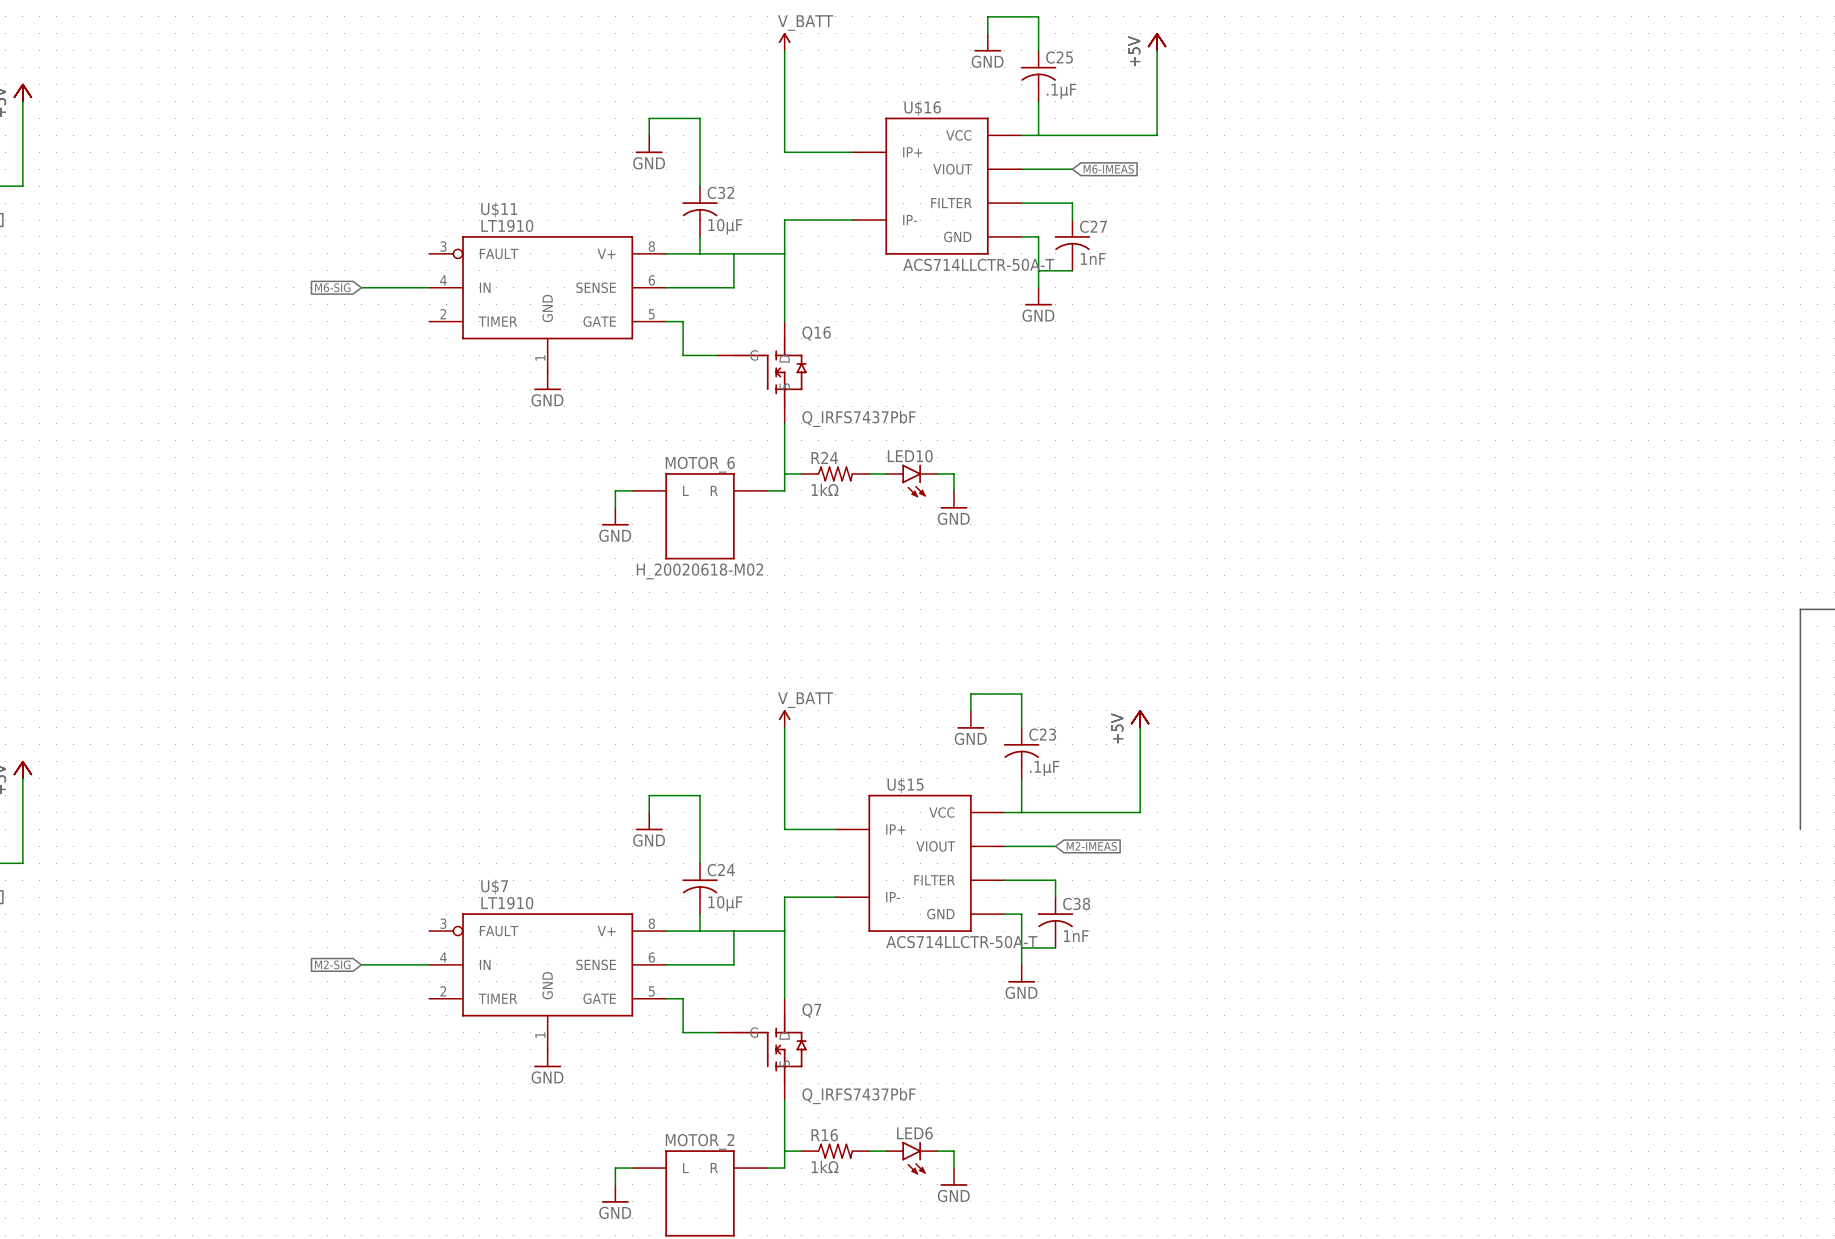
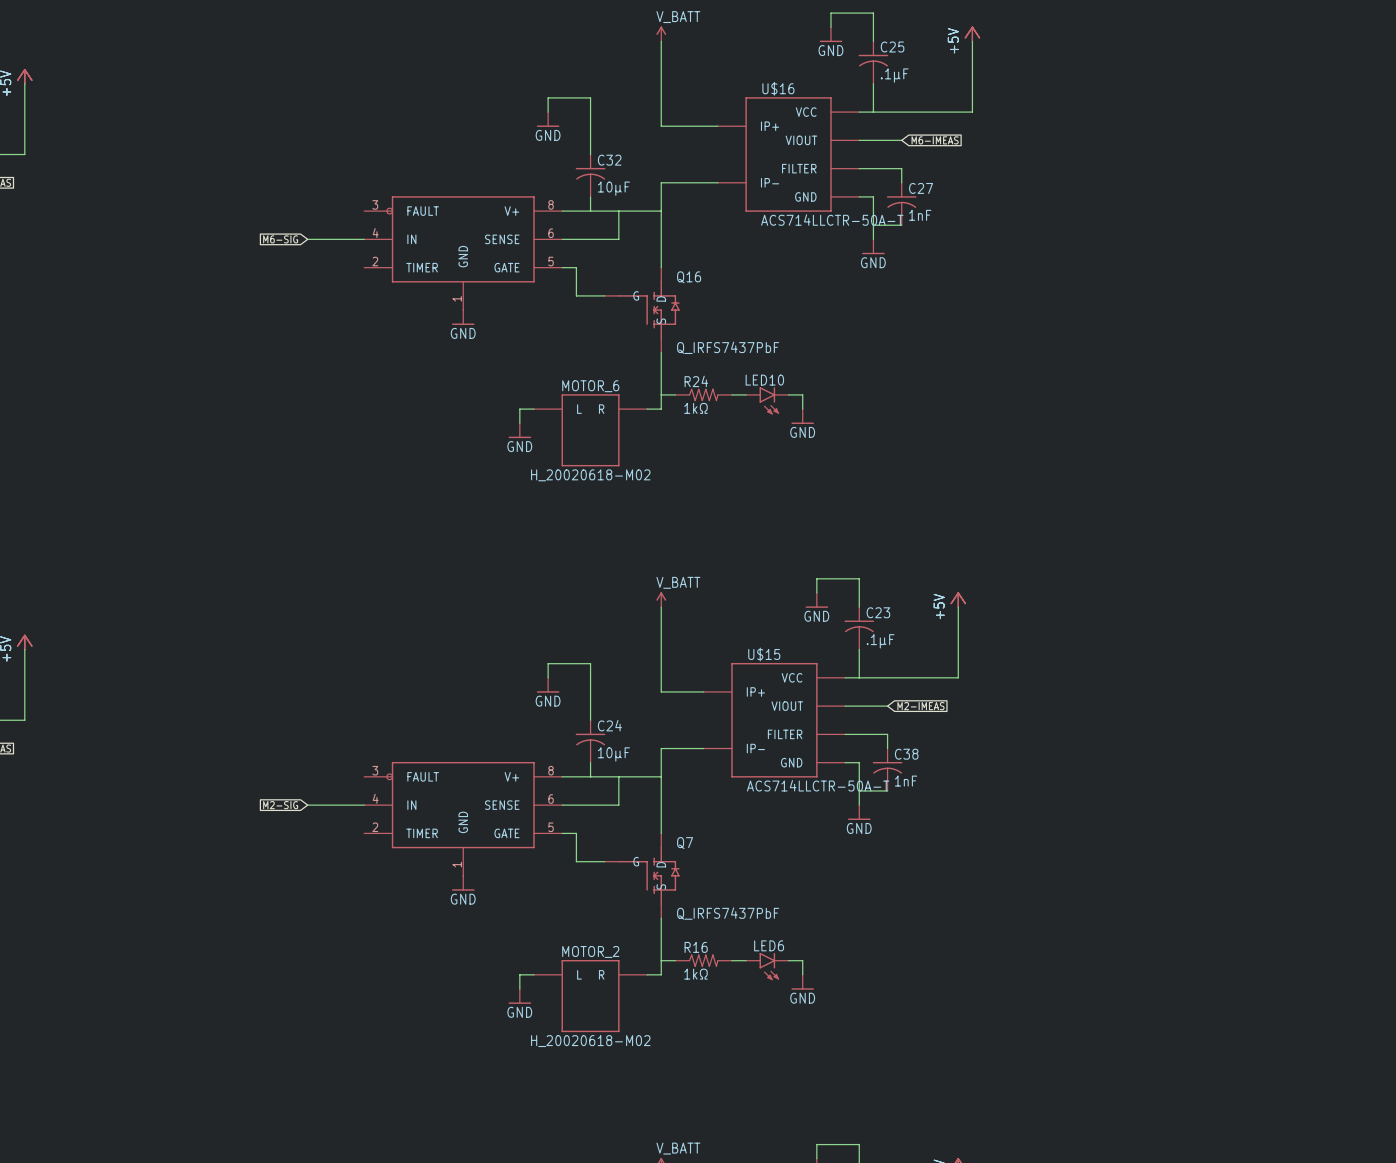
U$11: LT1910 (547, 304) -> none
part: none -> (463, 253)
U$7: LT1910 (547, 981) -> none
part: none -> (463, 818)

